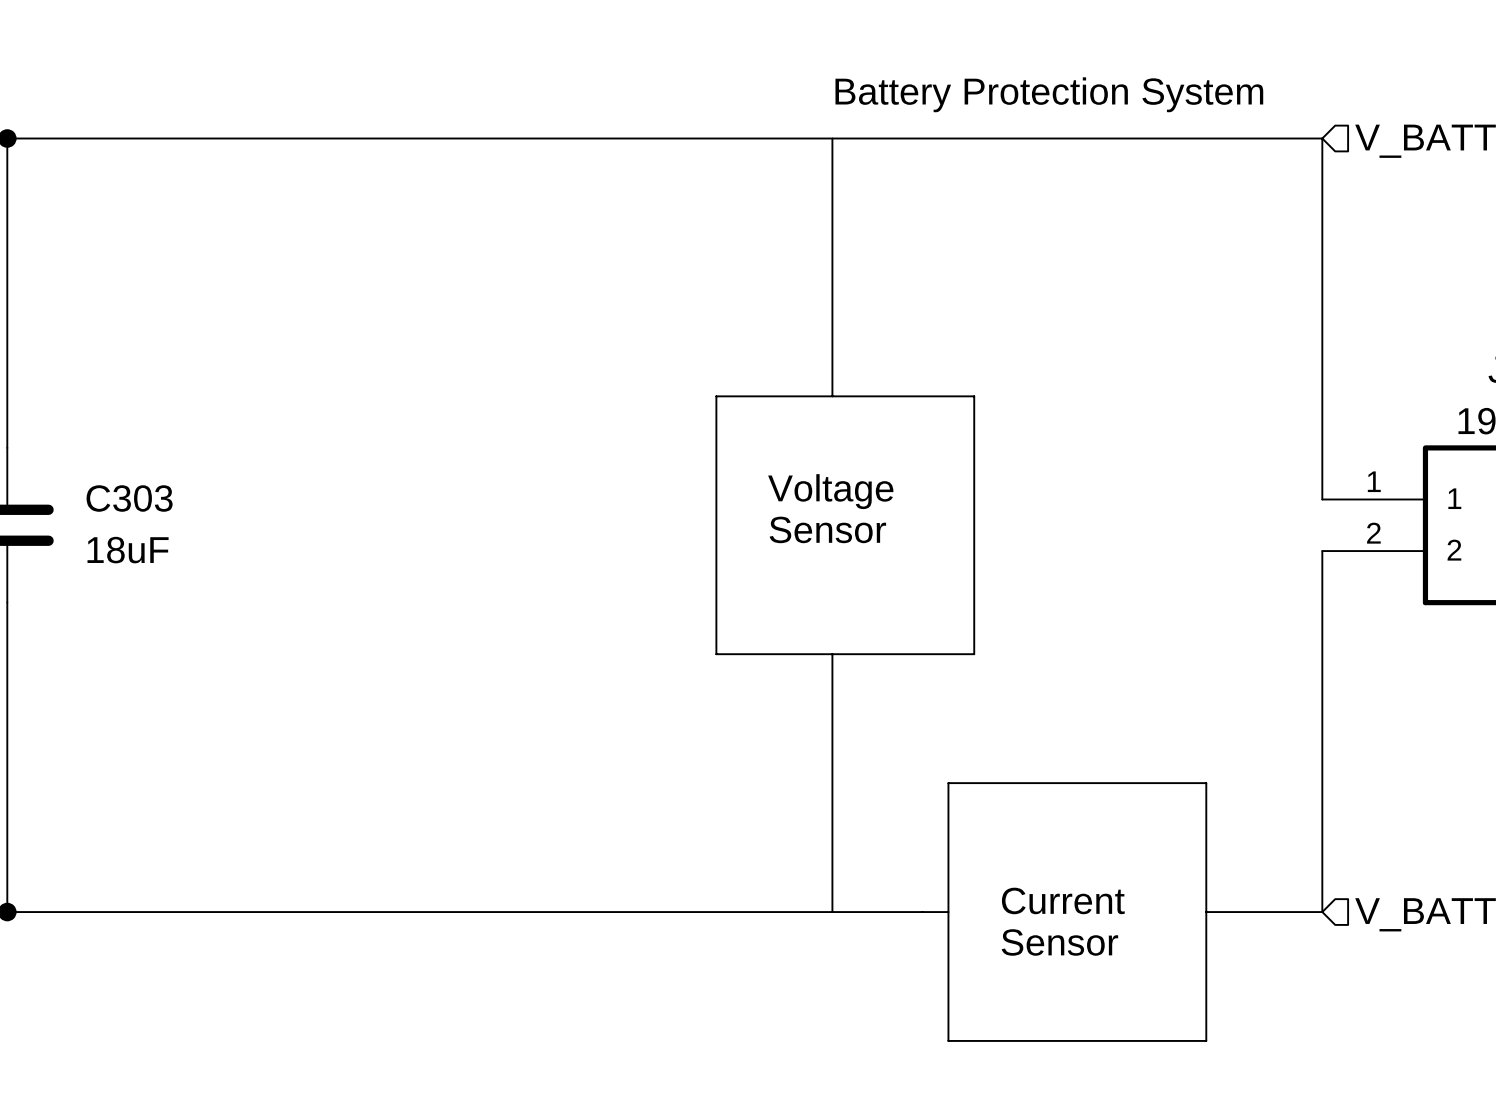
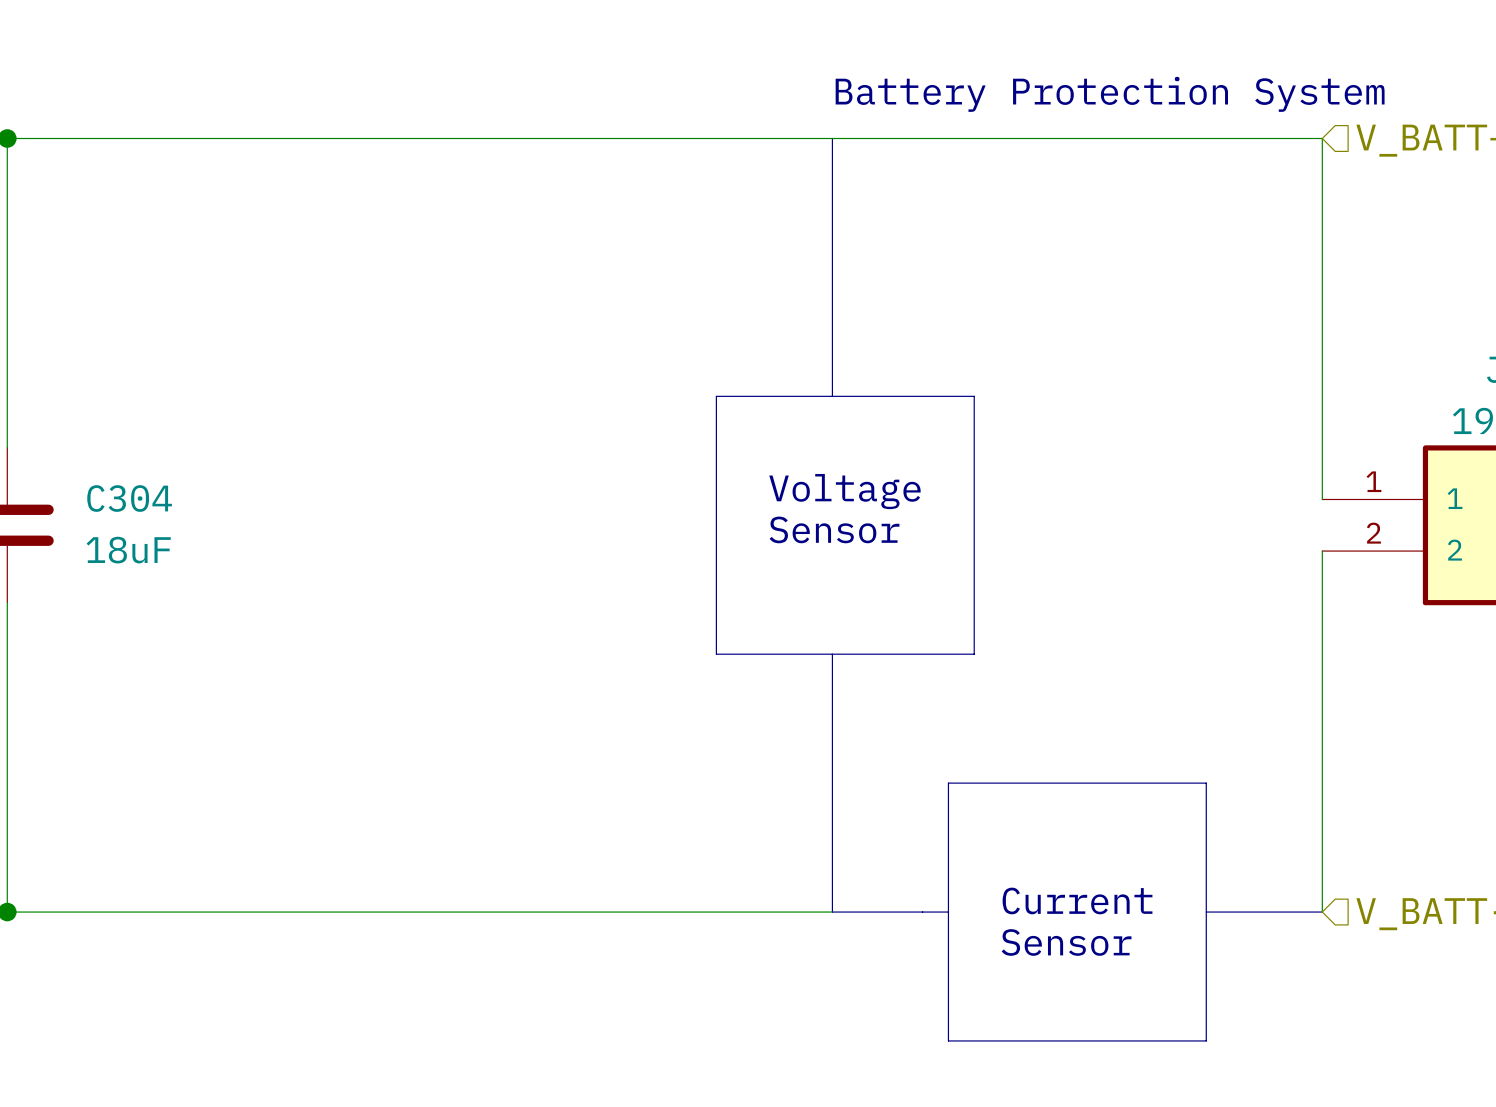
C303 name: C303 (129, 498) -> C304 (129, 498)

